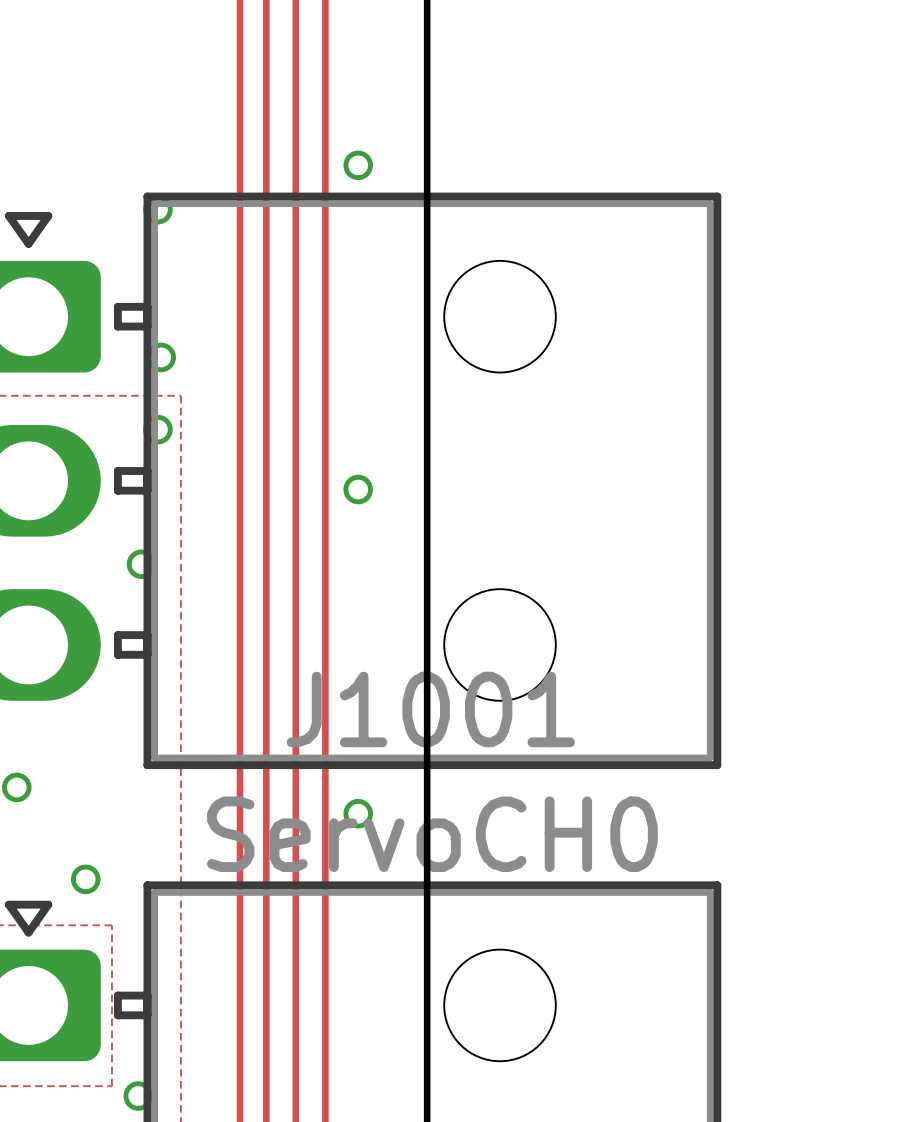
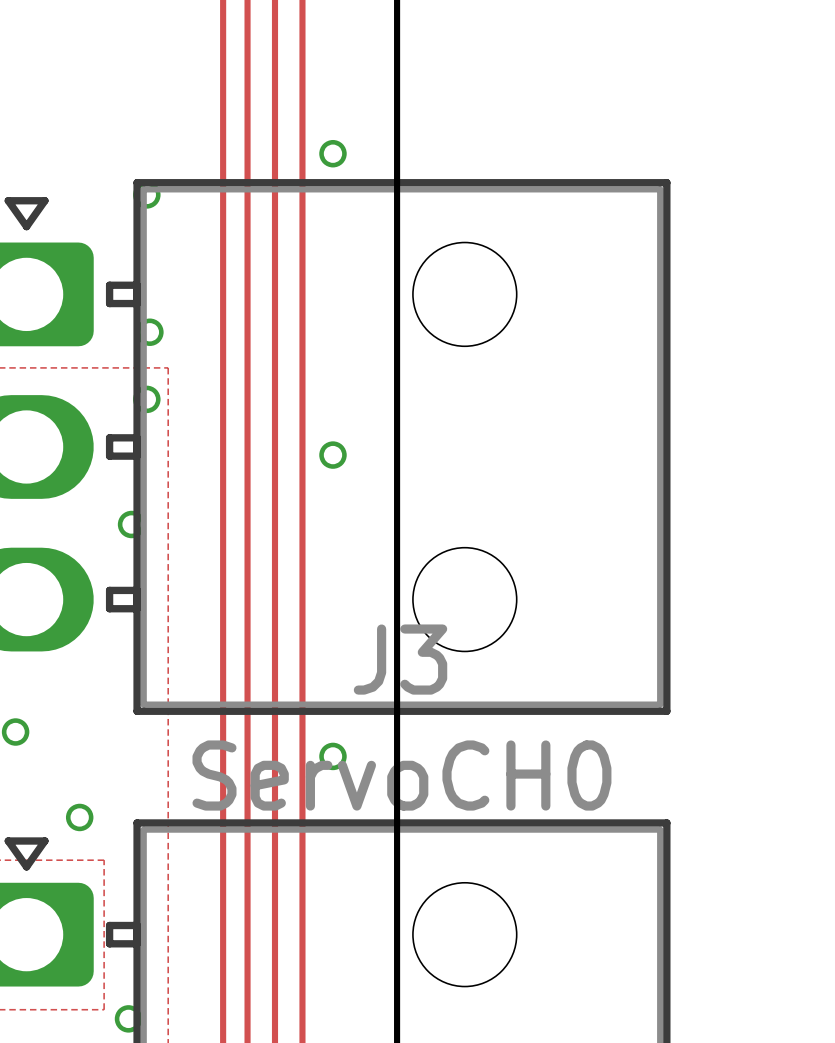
J1001 name: J1001 (430, 709) -> J3 (400, 659)

